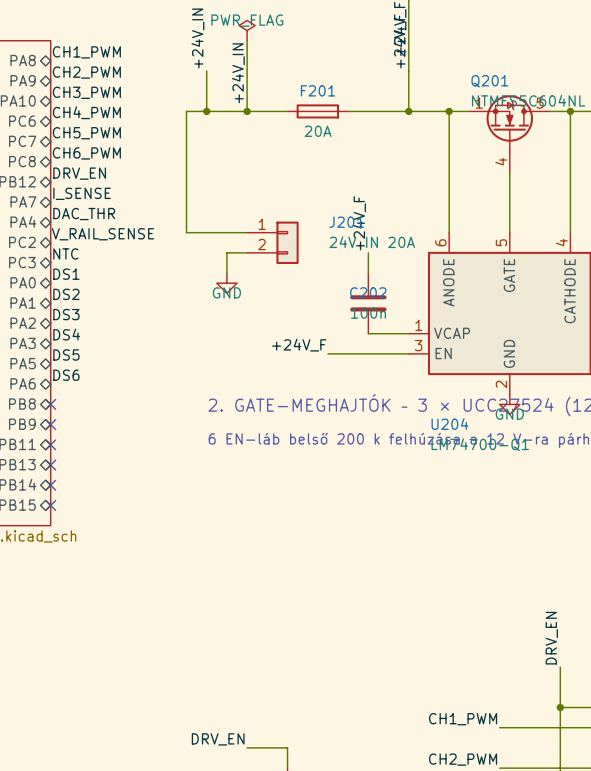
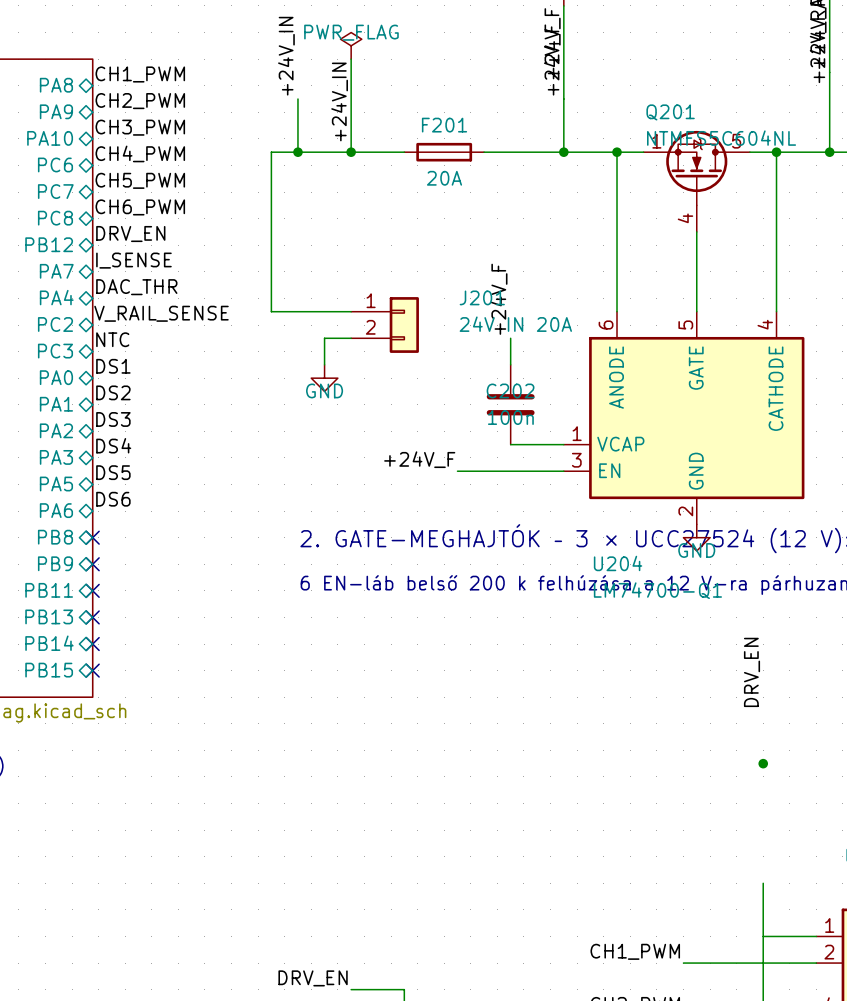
junction: none -> (763, 763)
label position: DRV_EN (551, 638) -> DRV_EN (751, 672)
junction: (560, 707) -> none

